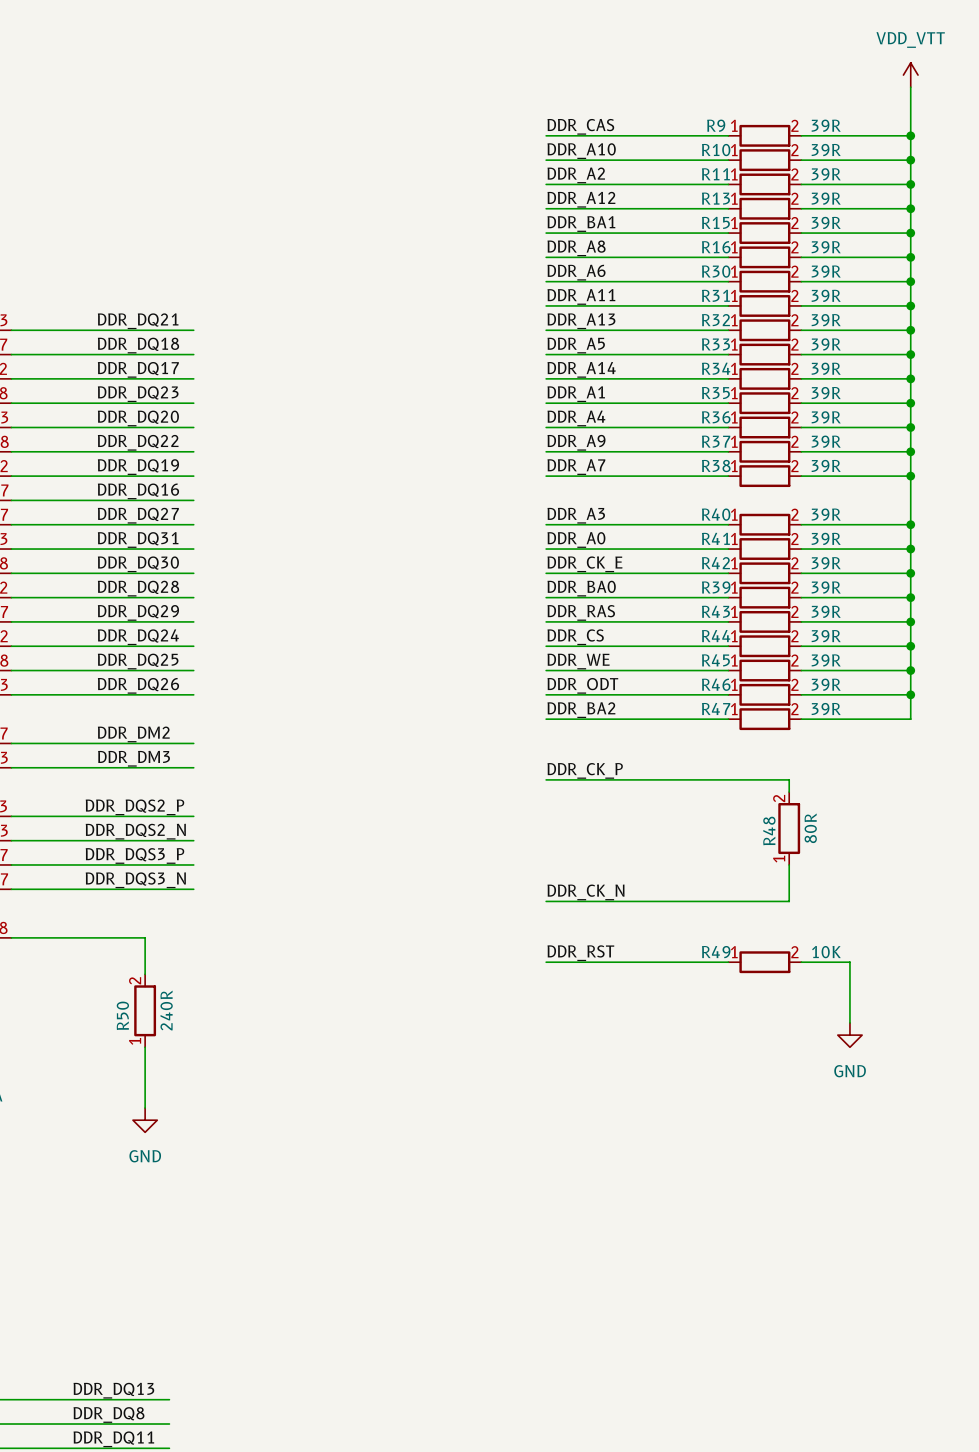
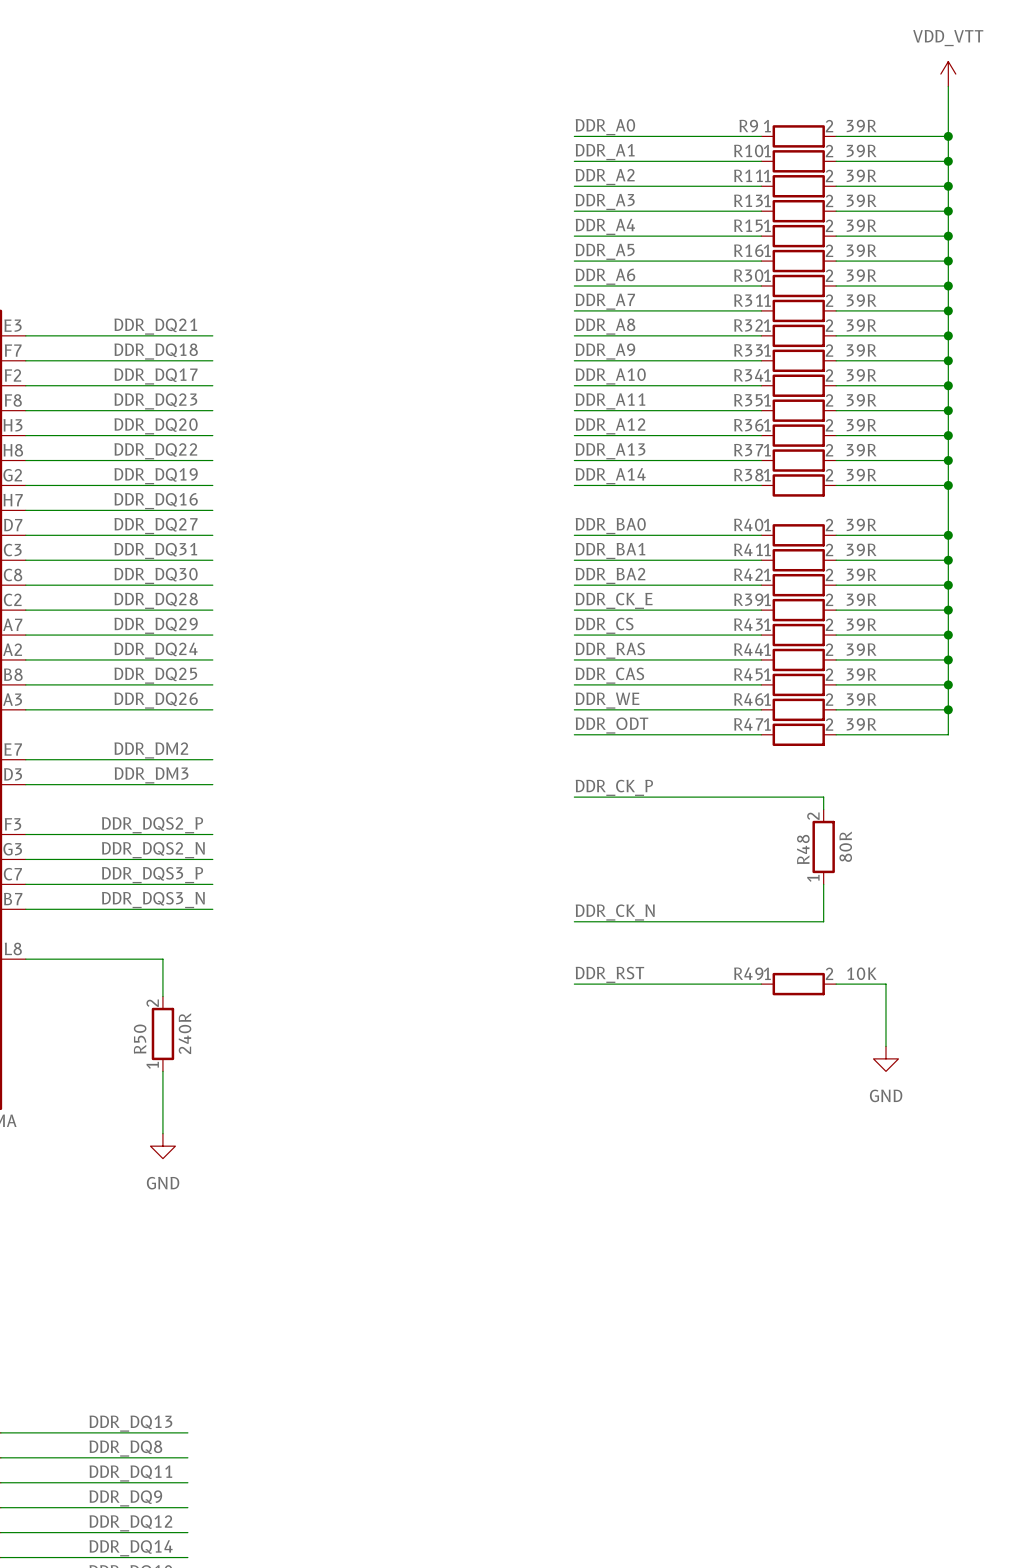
label: DDR_CAS (580, 126) -> DDR_A0 (605, 127)
label: DDR_A10 (581, 151) -> DDR_A1 (605, 152)
label: DDR_A12 (581, 199) -> DDR_A3 (605, 201)
label: DDR_BA1 (581, 224) -> DDR_A4 (605, 226)
label: DDR_A8 (576, 248) -> DDR_A5 (605, 251)
label: DDR_A11 (581, 296) -> DDR_A7 (605, 301)
label: DDR_A13 (581, 321) -> DDR_A8 (605, 326)
label: DDR_A5 (576, 345) -> DDR_A9 (605, 351)
label: DDR_A14 (581, 369) -> DDR_A10 (610, 376)
label: DDR_A1 (576, 394) -> DDR_A11 (610, 401)
label: DDR_A4 (576, 418) -> DDR_A12 (610, 426)
label: DDR_A9 (576, 442) -> DDR_A13 (610, 451)
label: DDR_A7 (576, 467) -> DDR_A14 (610, 476)
label: DDR_A3 (576, 515) -> DDR_BA0 (610, 526)
label: DDR_A0 (576, 539) -> DDR_BA1 (610, 550)
label: DDR_CK_E (584, 564) -> DDR_BA2 (610, 575)
label: DDR_BA0 (581, 588) -> DDR_CK_E (614, 600)
label: DDR_RAS (581, 612) -> DDR_CS (604, 625)
label: DDR_CS (575, 637) -> DDR_RAS (610, 650)
label: DDR_WE (578, 661) -> DDR_CAS (609, 675)
label: DDR_ODT (582, 685) -> DDR_WE (607, 700)
label: DDR_BA2 (581, 710) -> DDR_ODT (612, 725)

